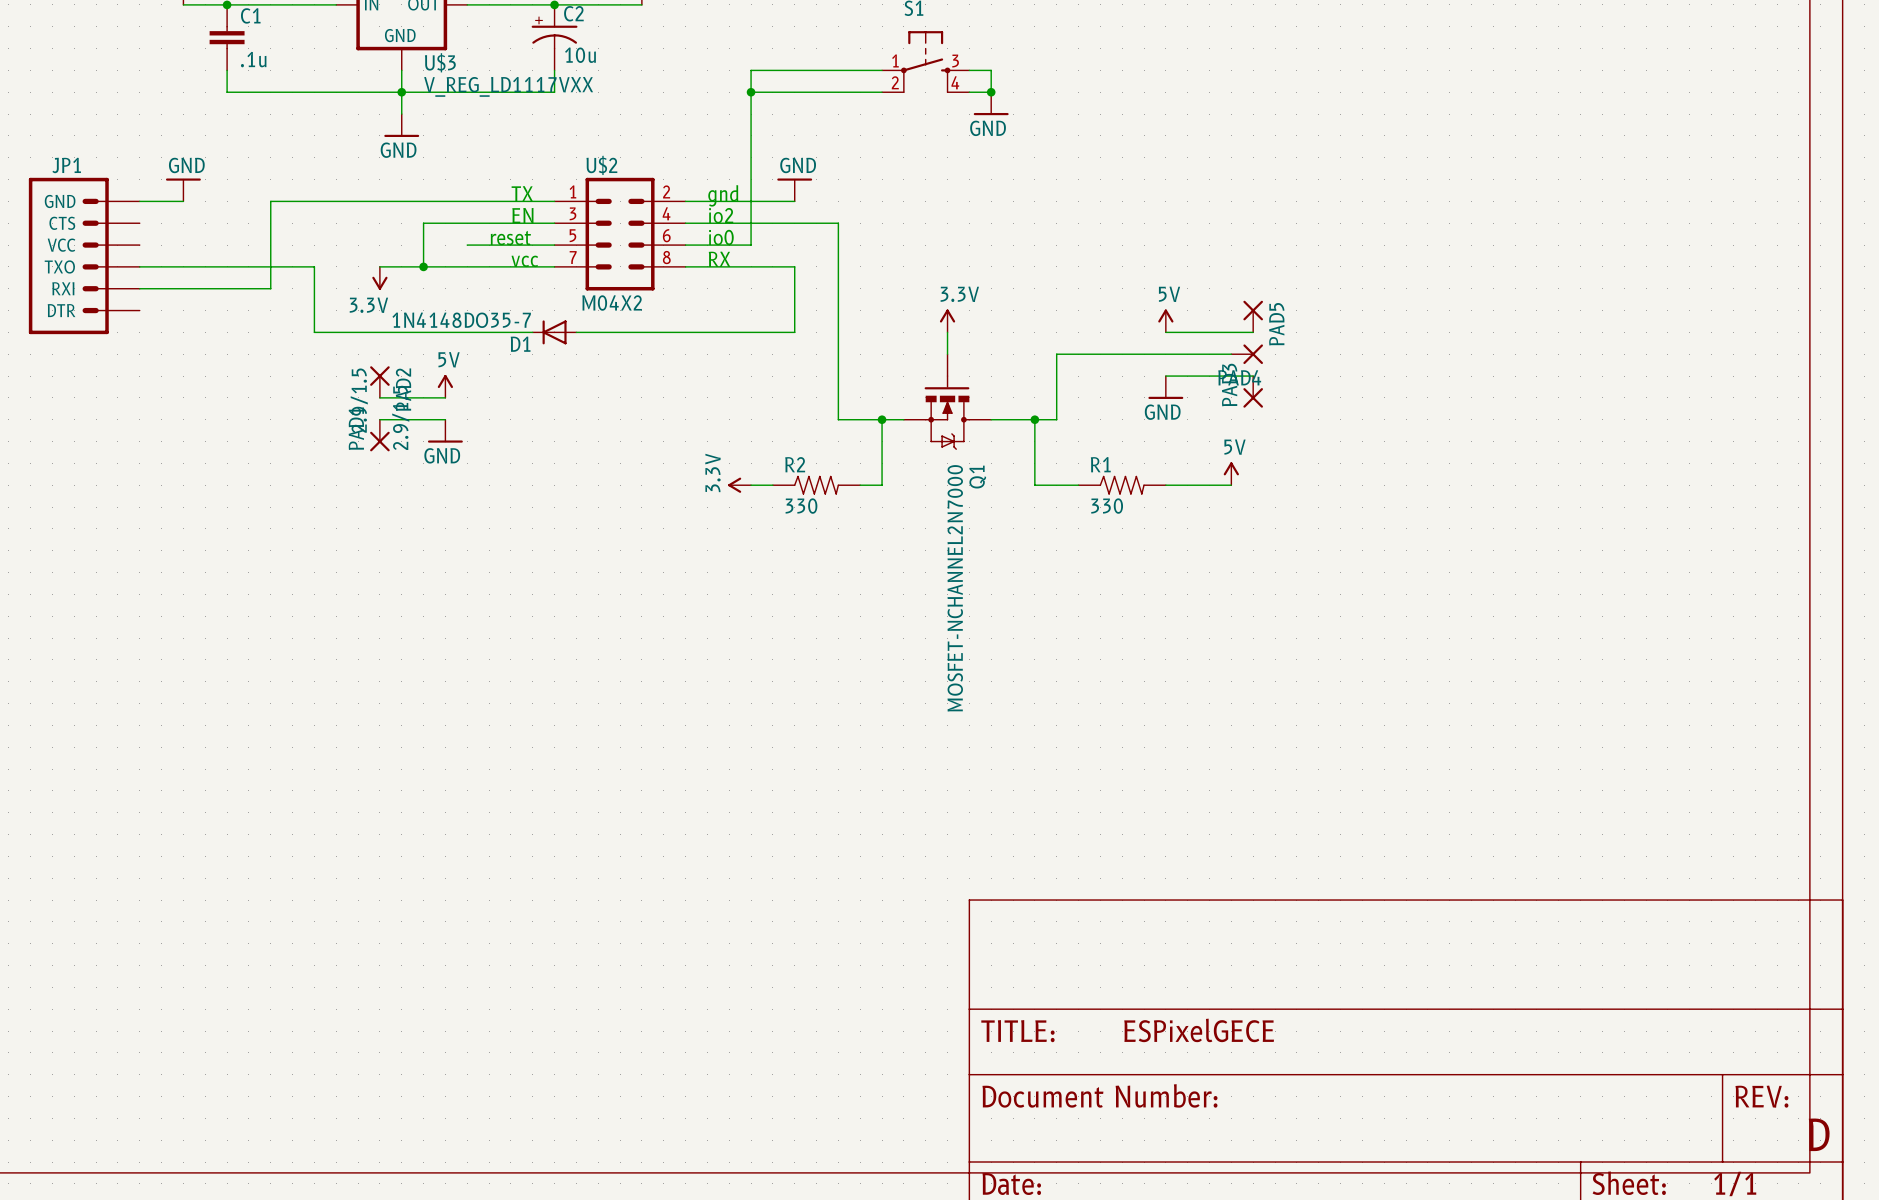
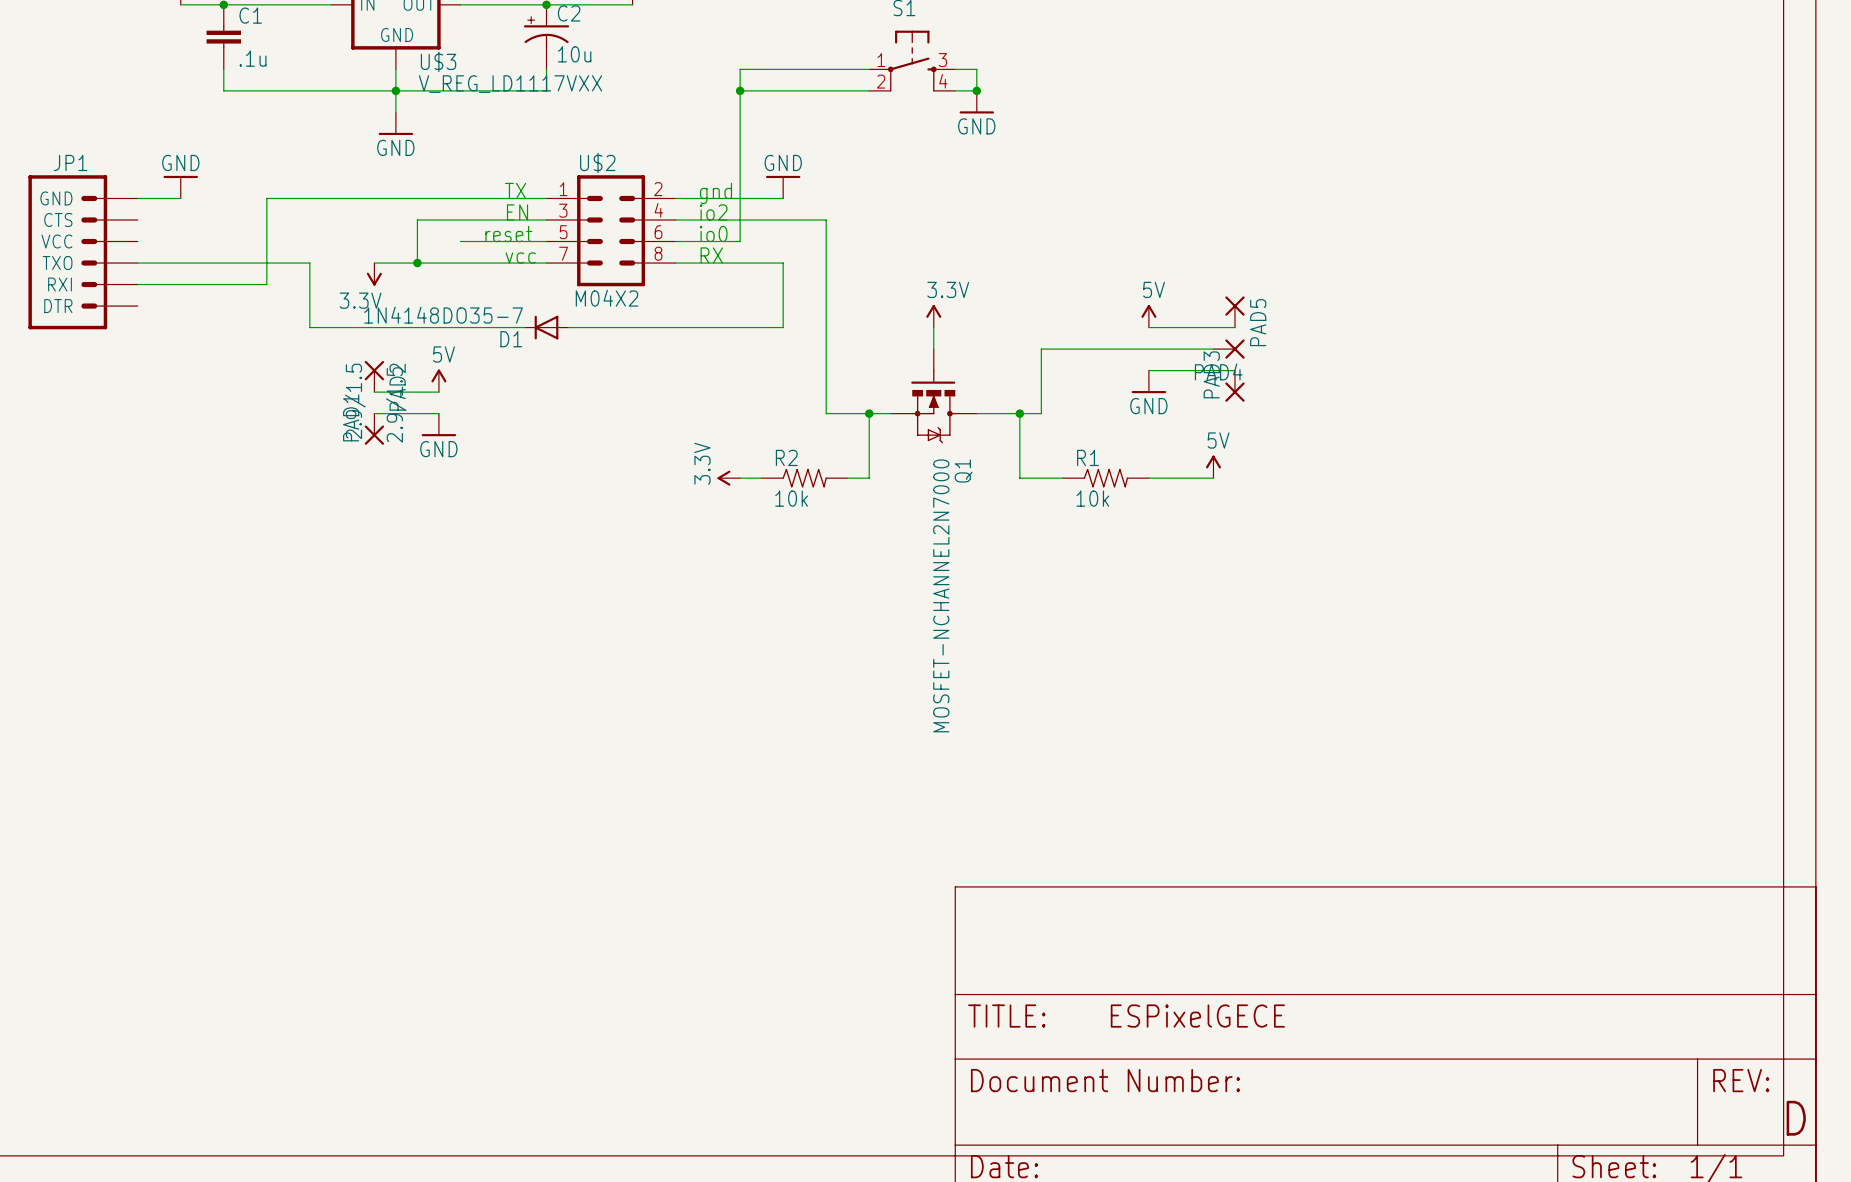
R2 value: 330 (801, 506) -> 10k (791, 498)
R1 value: 330 (1107, 506) -> 10k (1092, 498)

